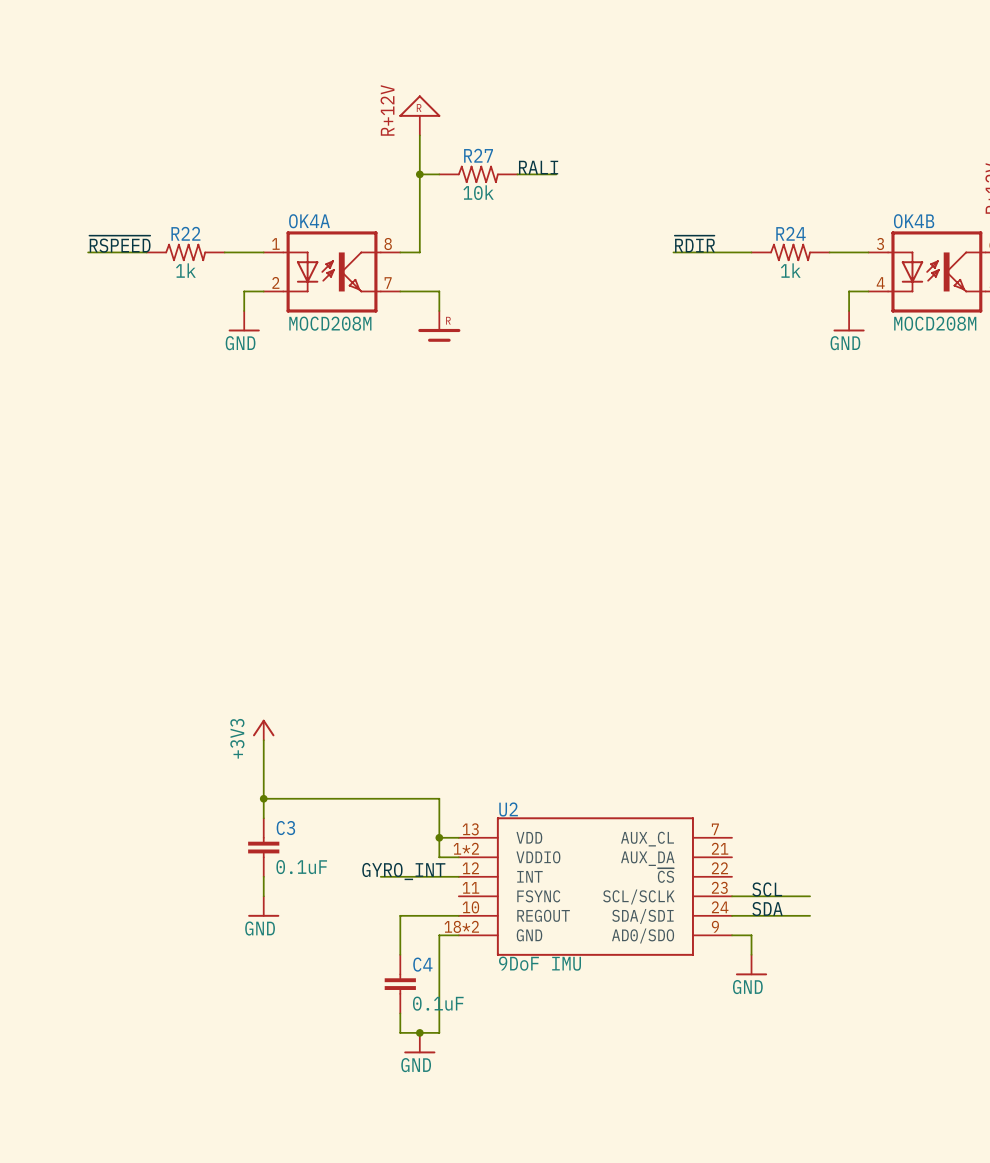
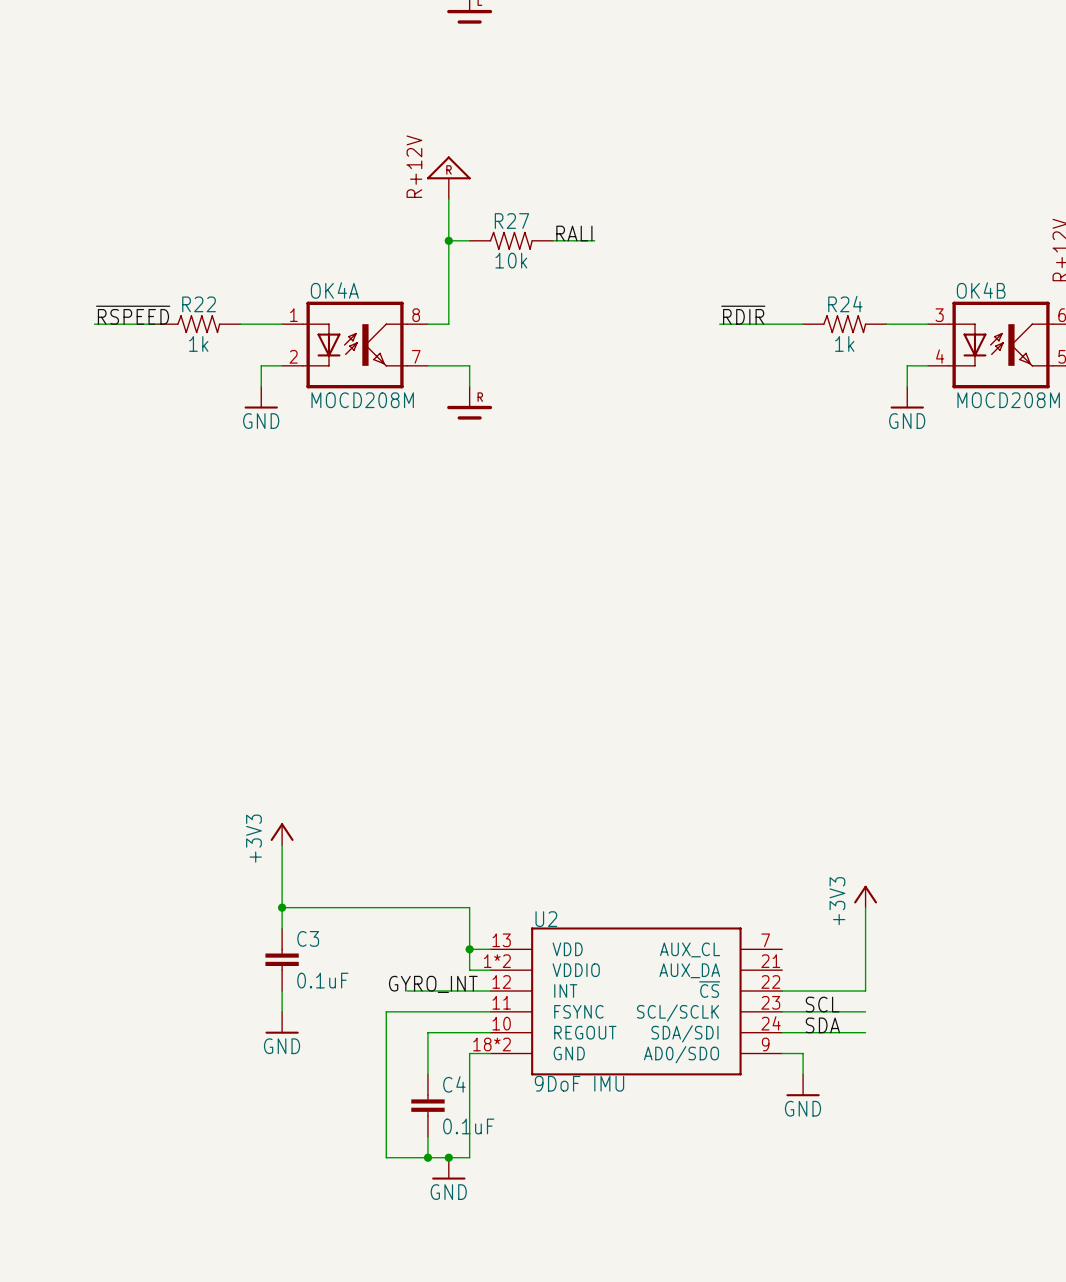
power symbol: none -> +3V3 (865, 896)
wire: none -> (865, 907) (865, 991) (782, 991)
wire: none -> (490, 1011) (386, 1011) (386, 1157) (427, 1157)
junction: none -> (427, 1157)

